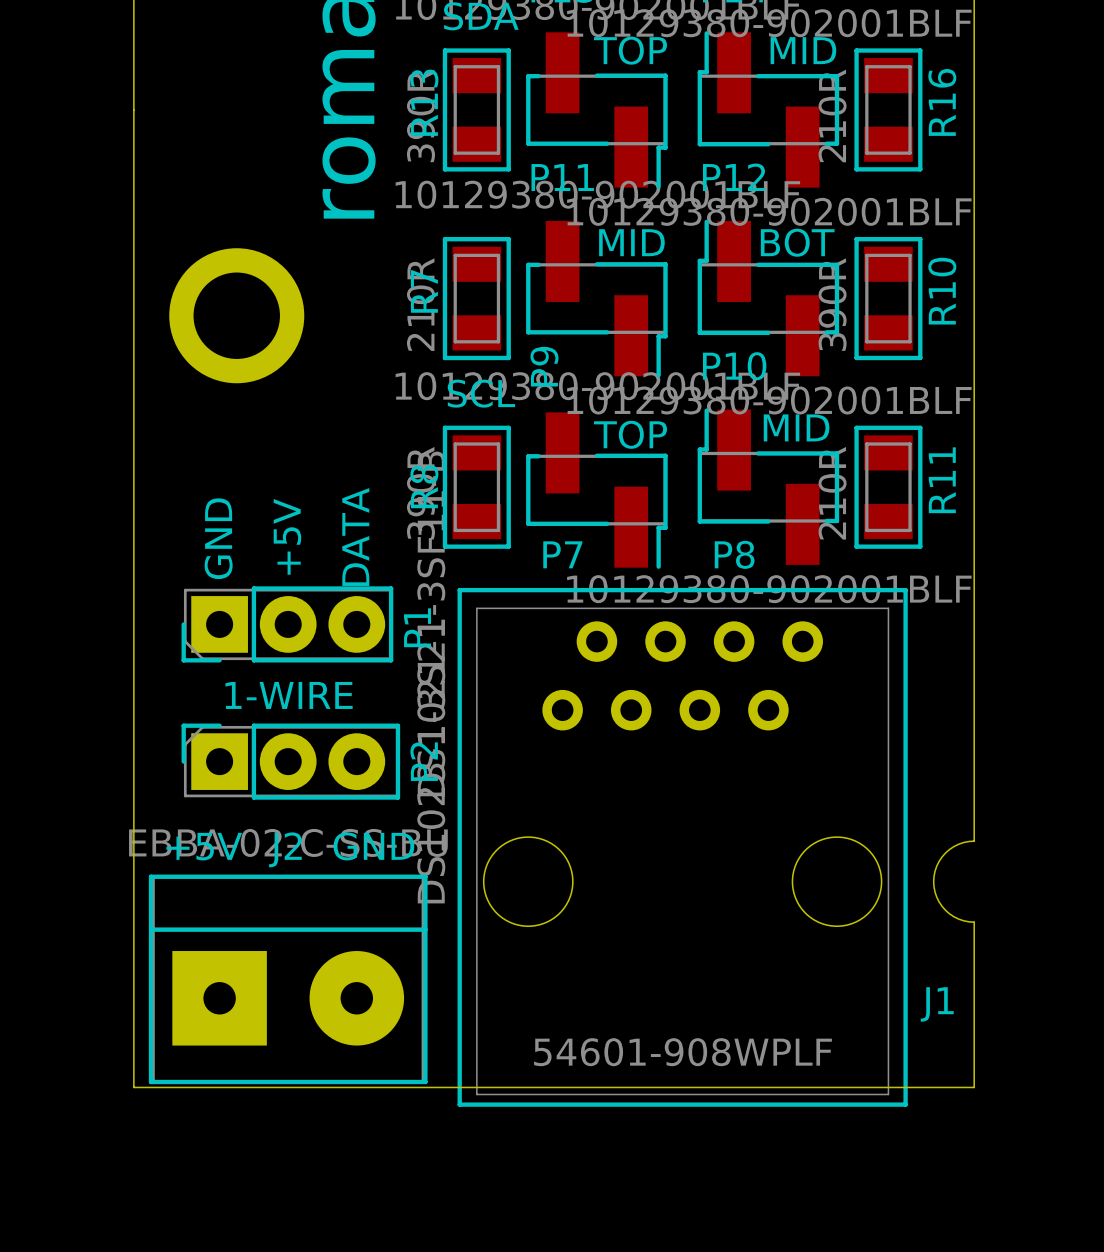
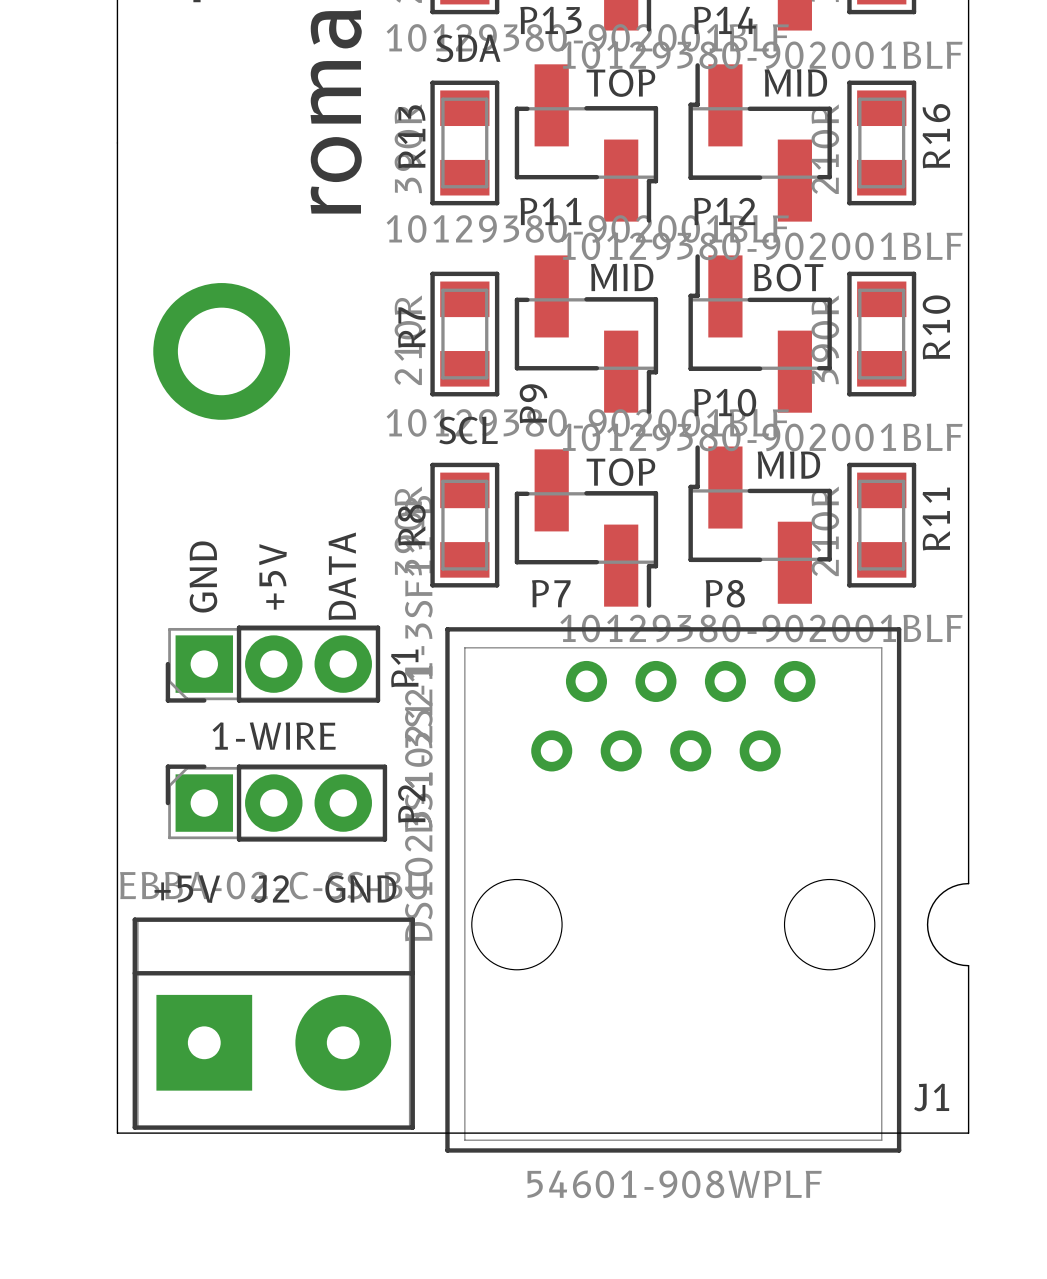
J1 name position: J1 (937, 1004) -> J1 (931, 1097)
J1 value position: 54601-908WPLF (683, 1052) -> 54601-908WPLF (674, 1184)

